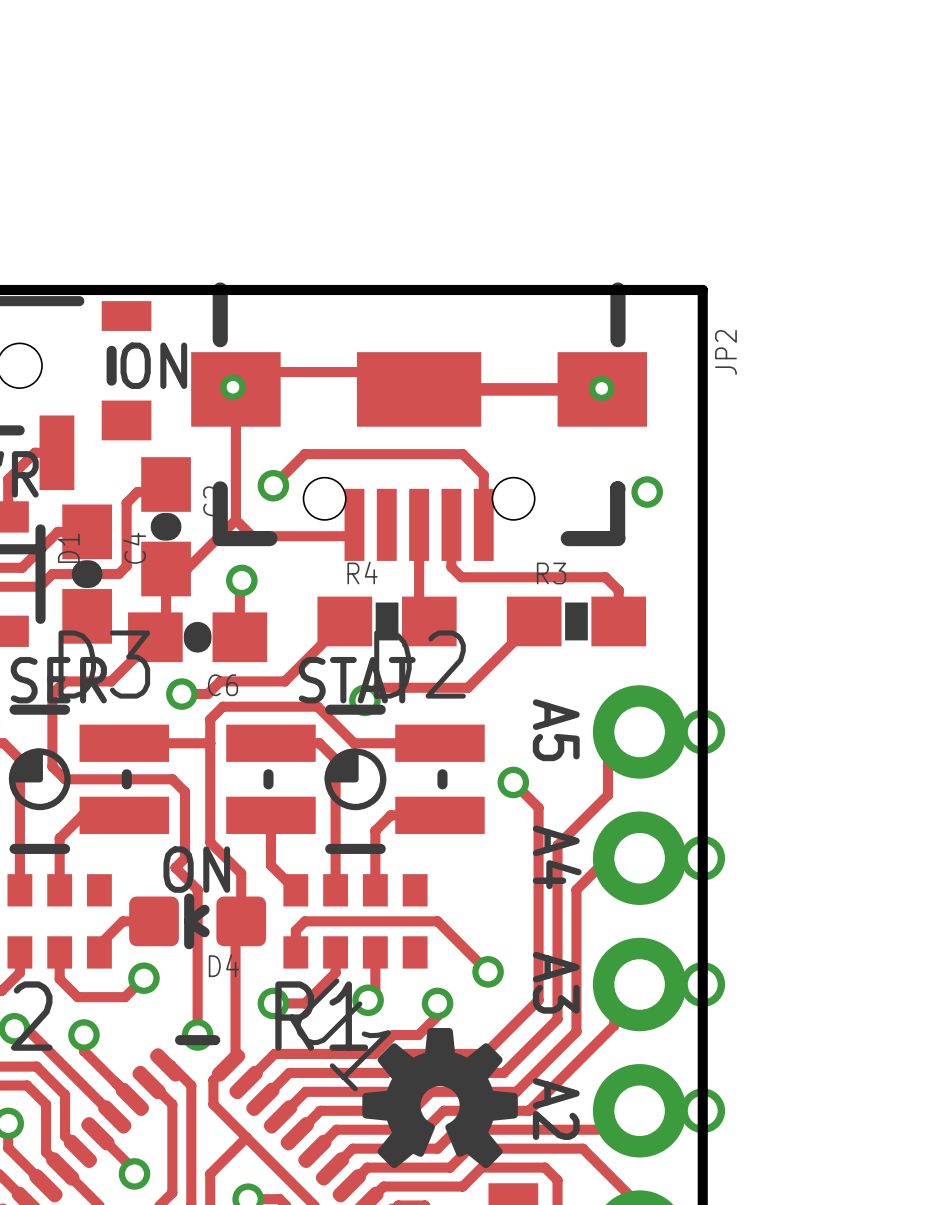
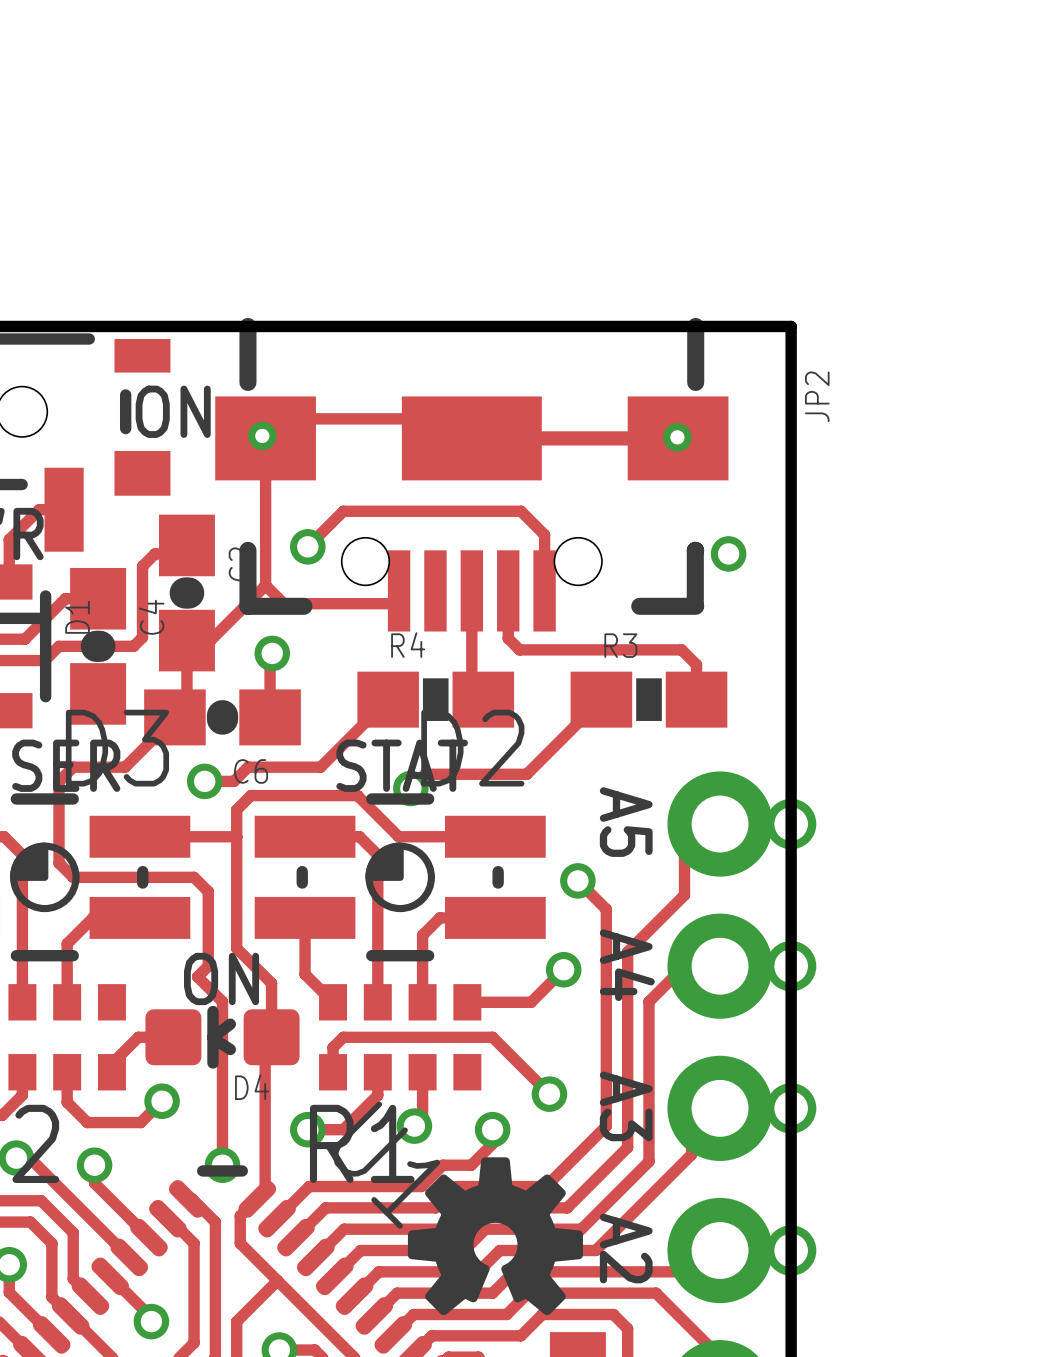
track: none -> (563, 969) (531, 1002) (467, 1002)
via: none -> (563, 969)

